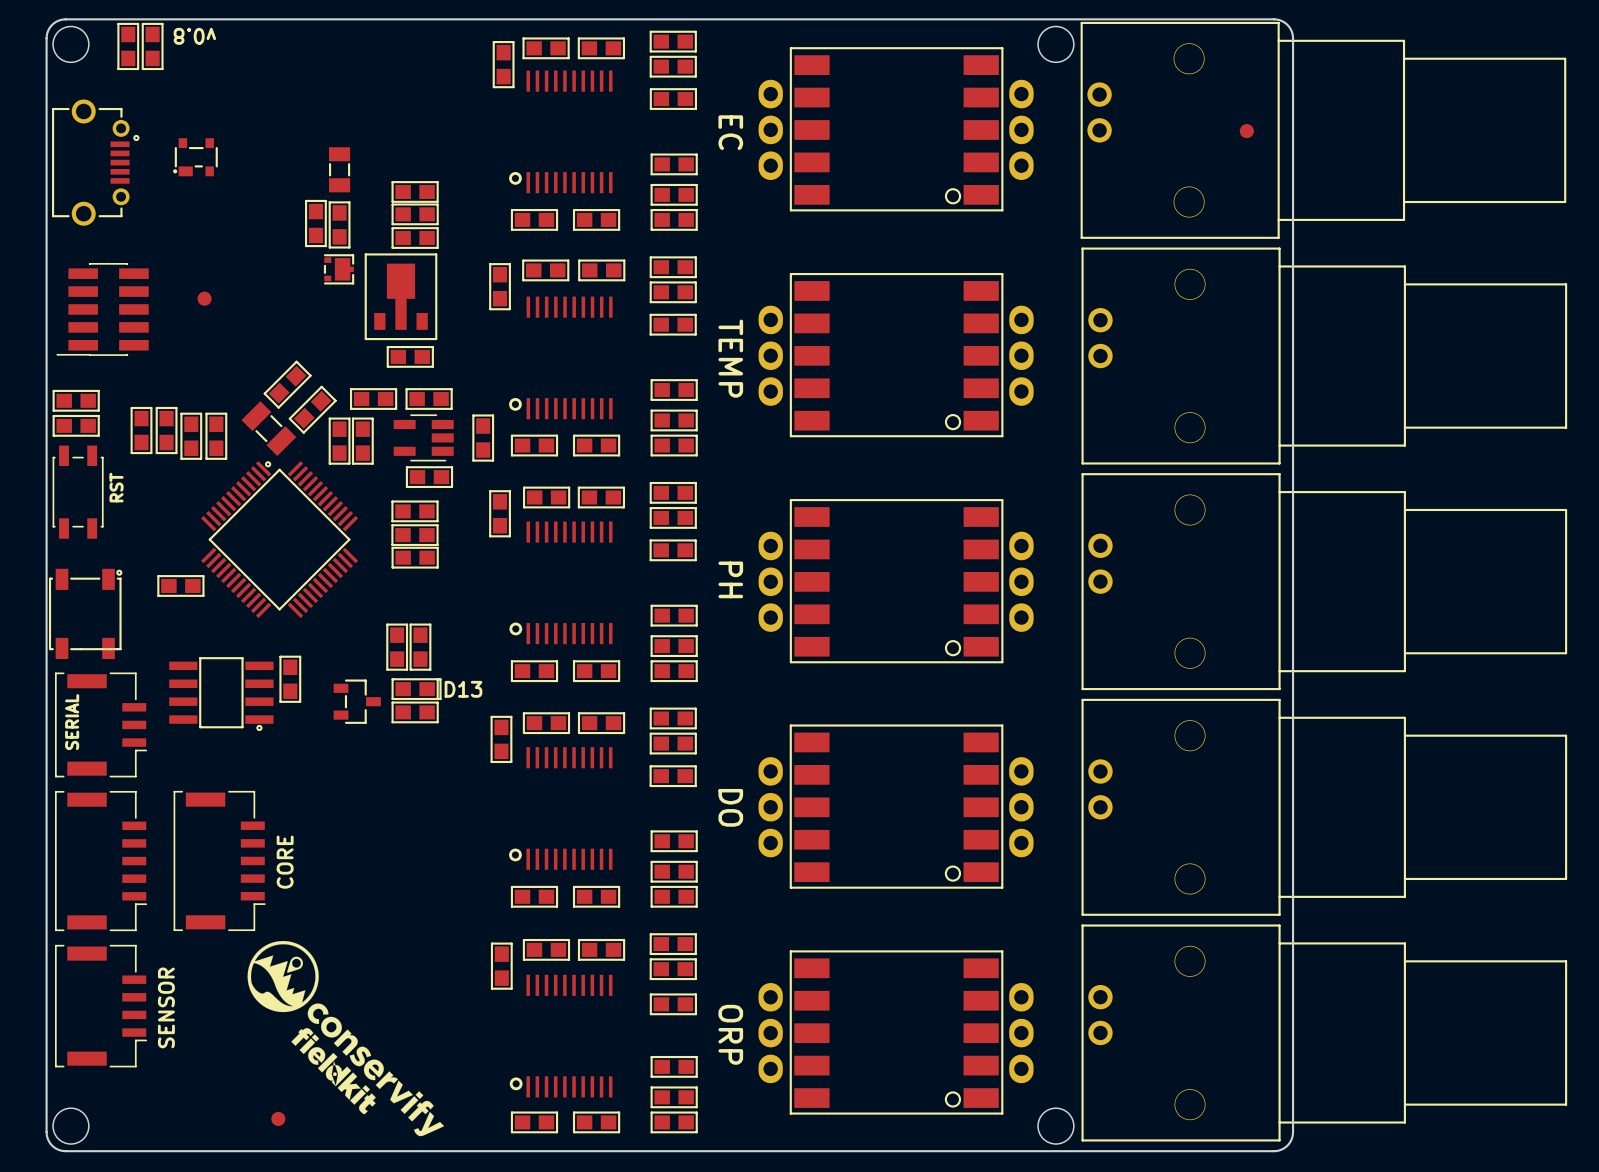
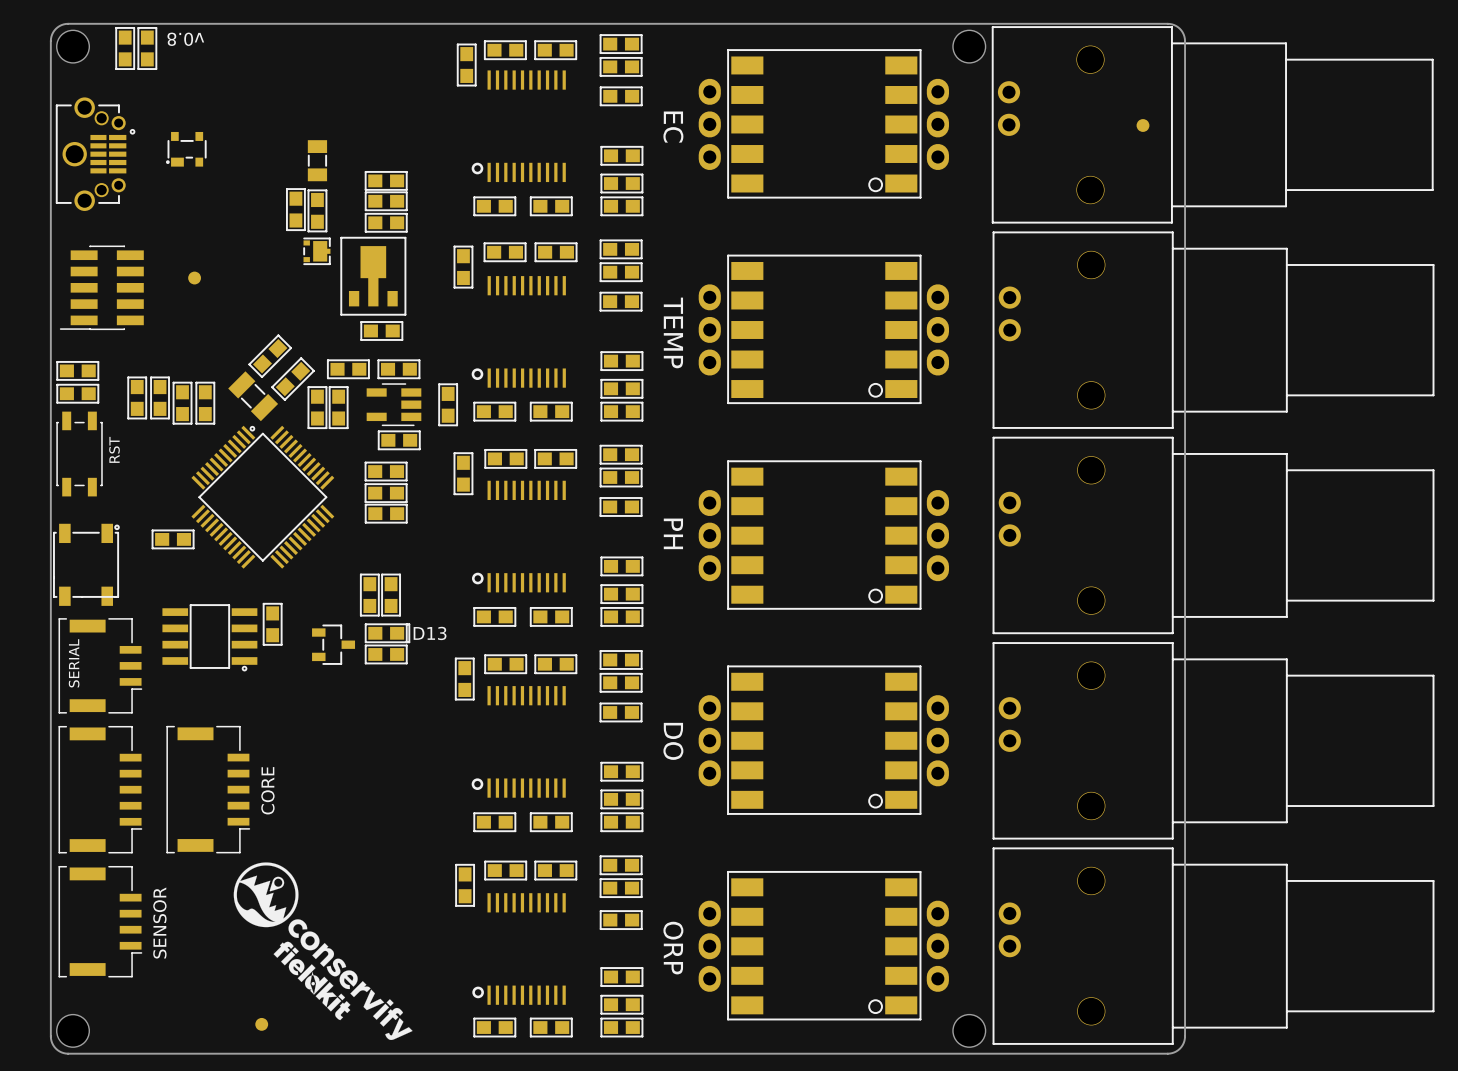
part footprint: [52, 99, 140, 226] -> [55, 97, 136, 211]

